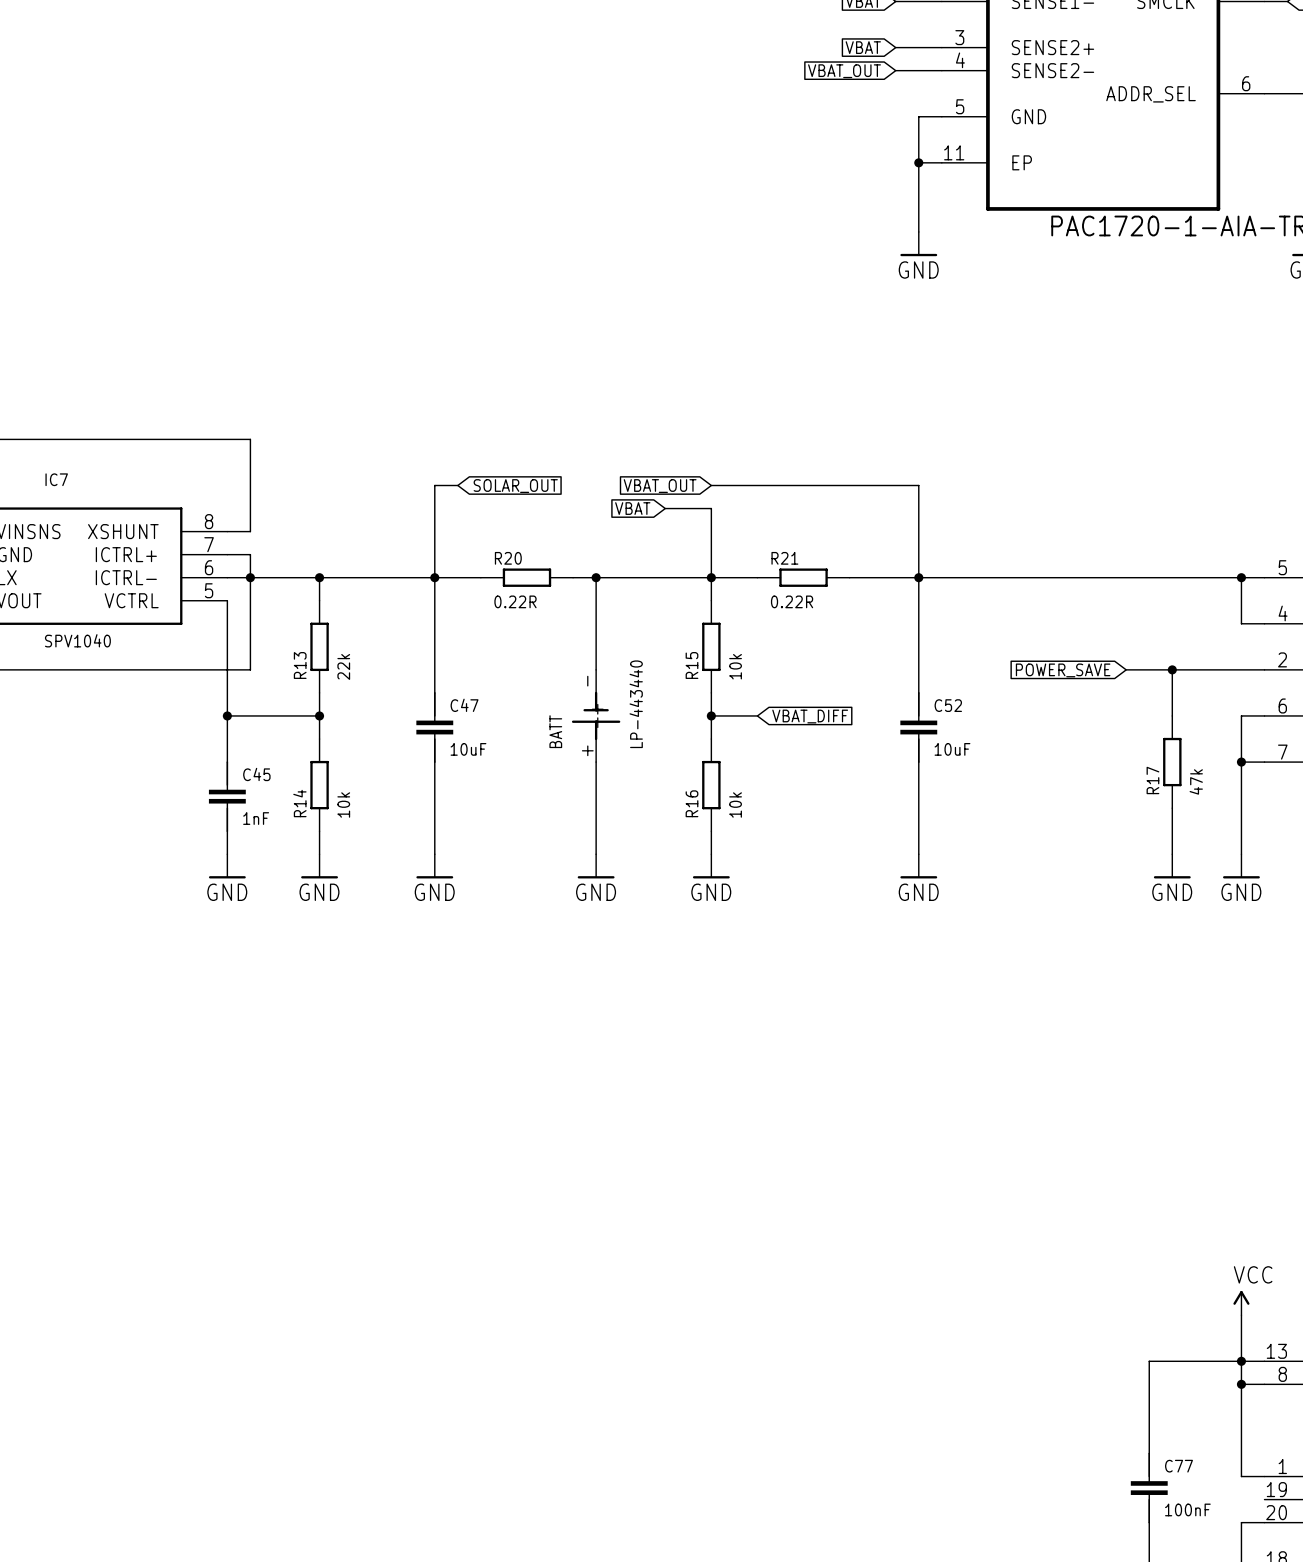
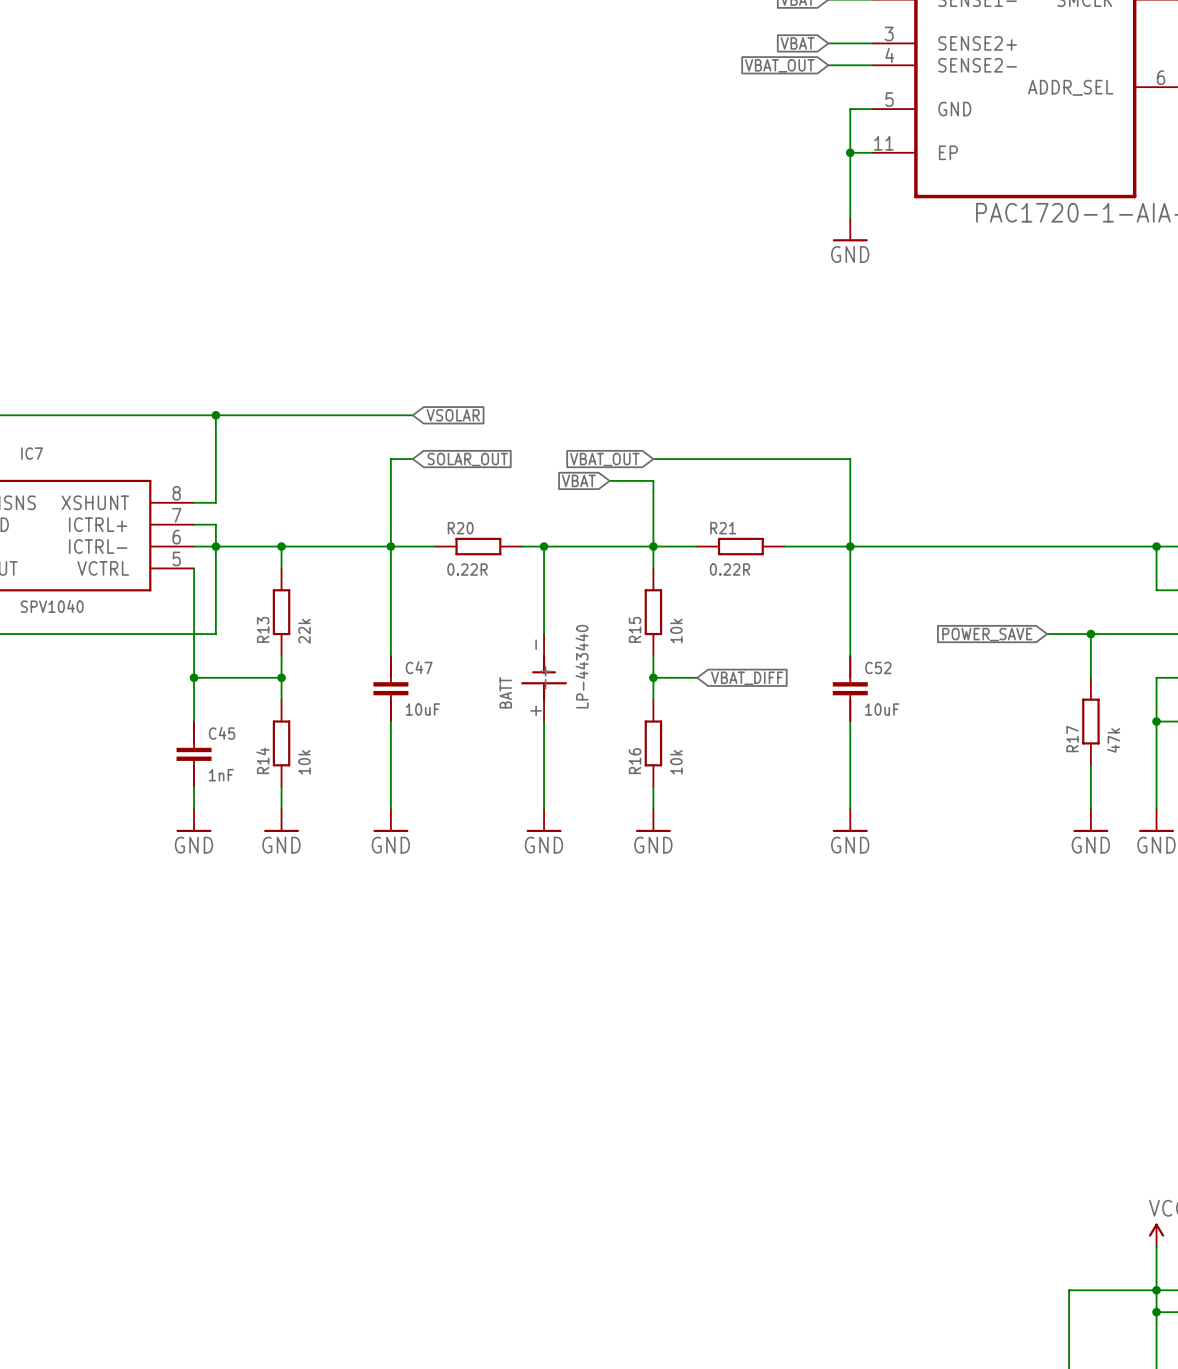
wire: none -> (215, 415) (412, 415)
junction: none -> (215, 415)
global label: none -> VSOLAR (453, 415)

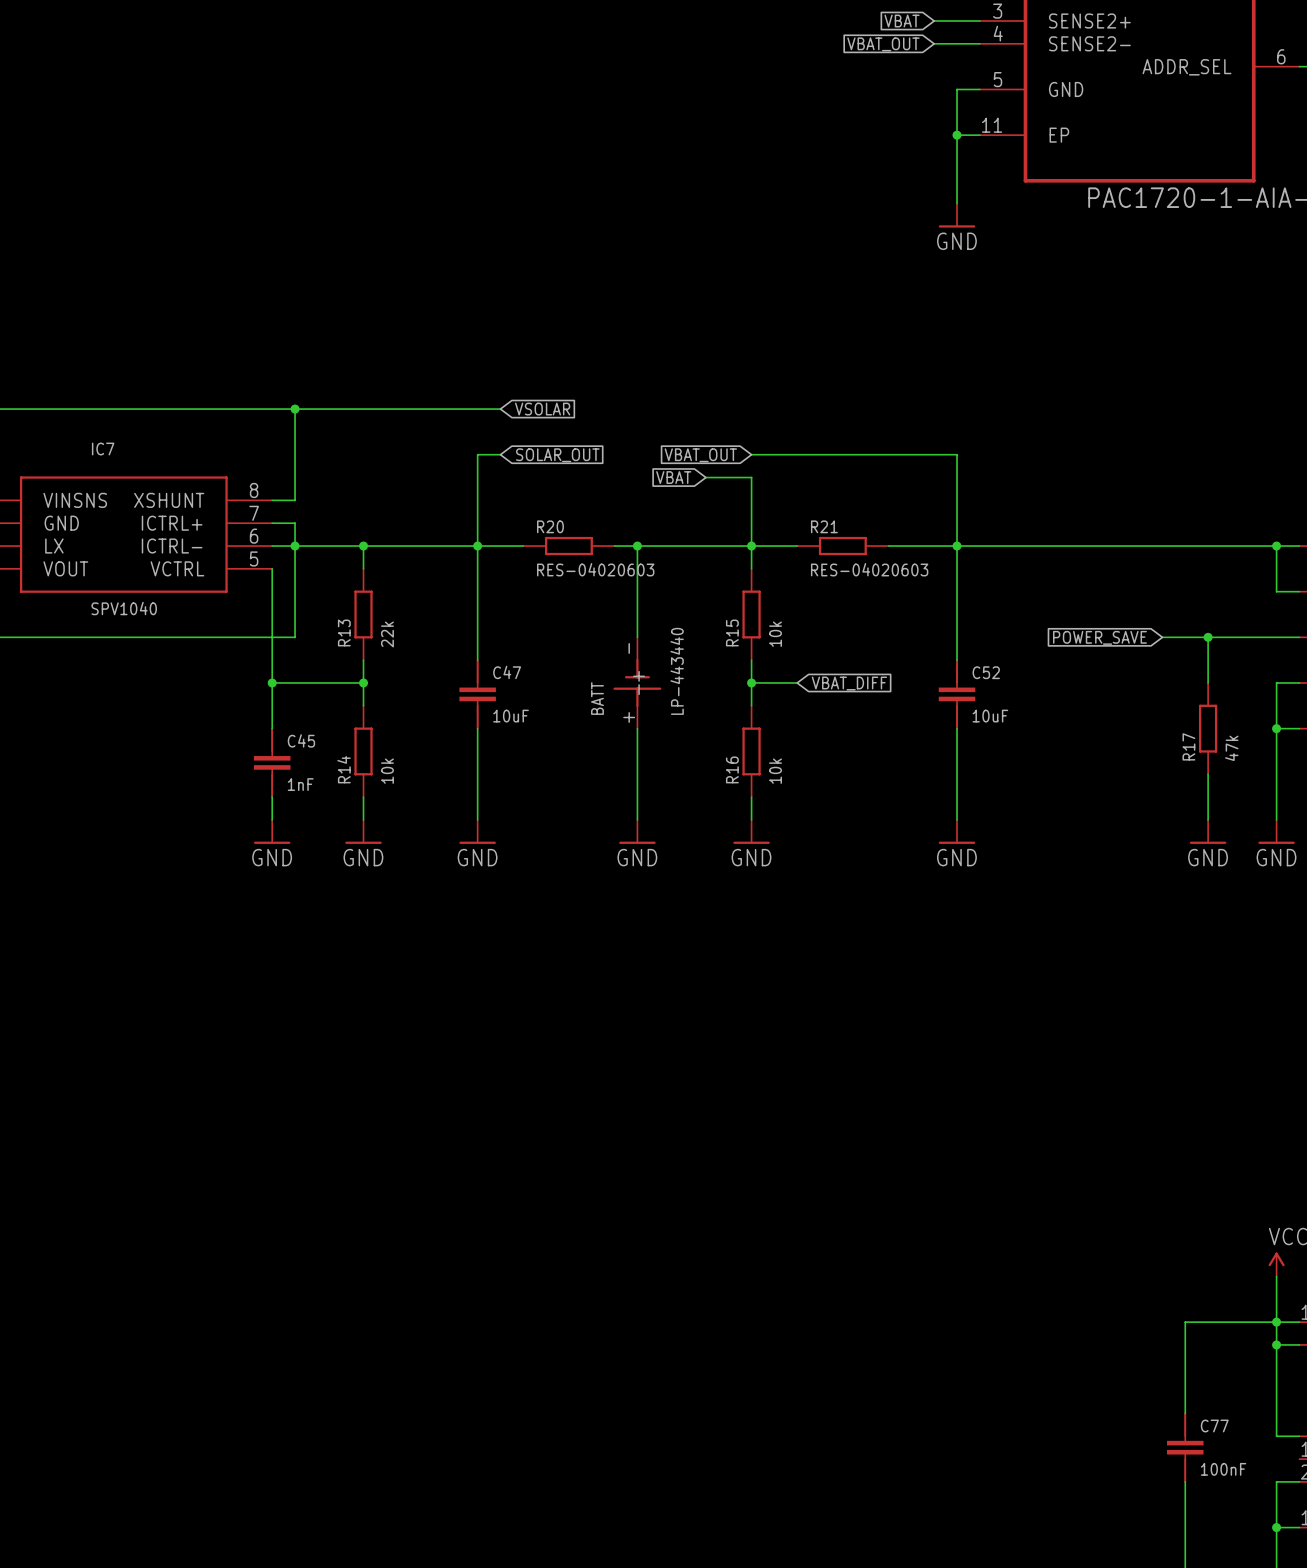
R20 value: 0.22R (467, 569) -> RES-04020603 (595, 569)
R21 value: 0.22R (730, 569) -> RES-04020603 (869, 569)

